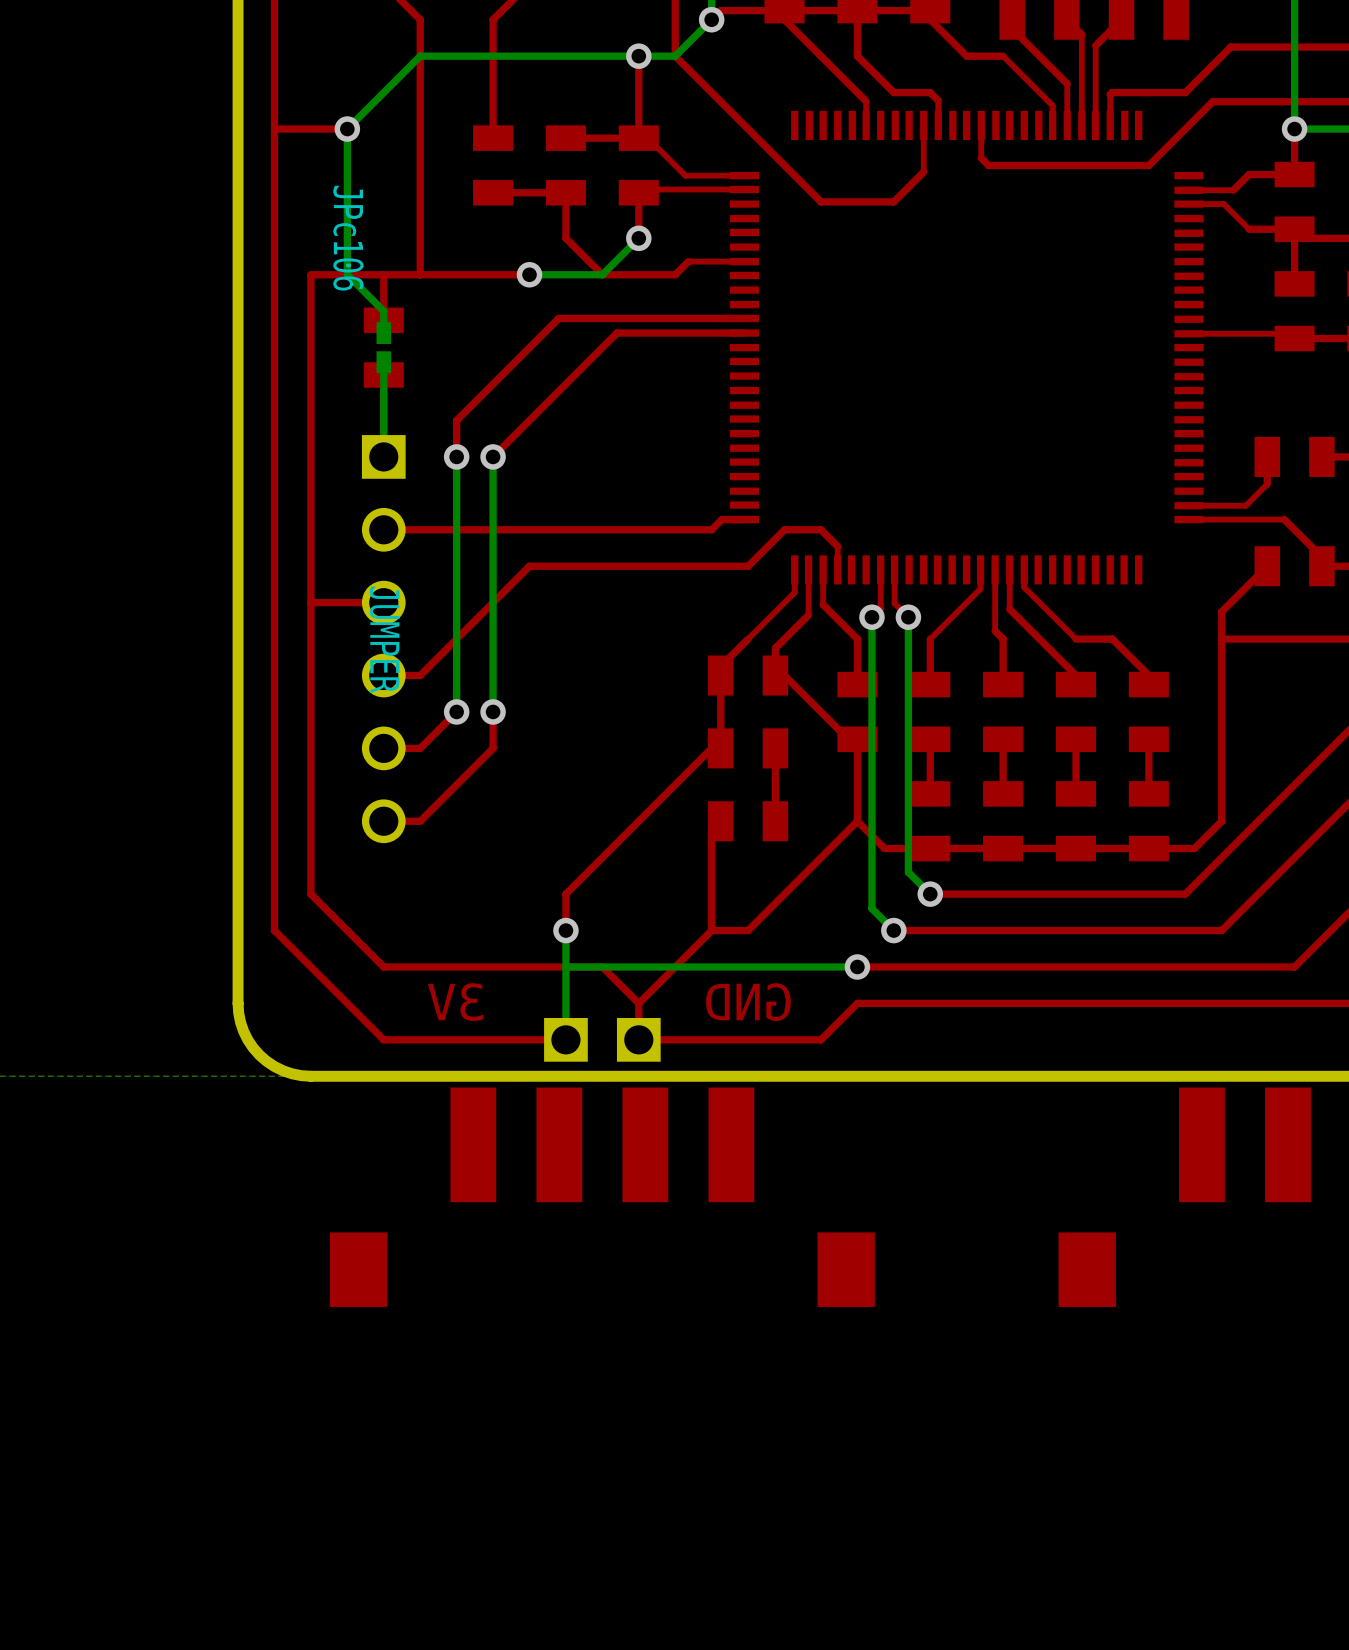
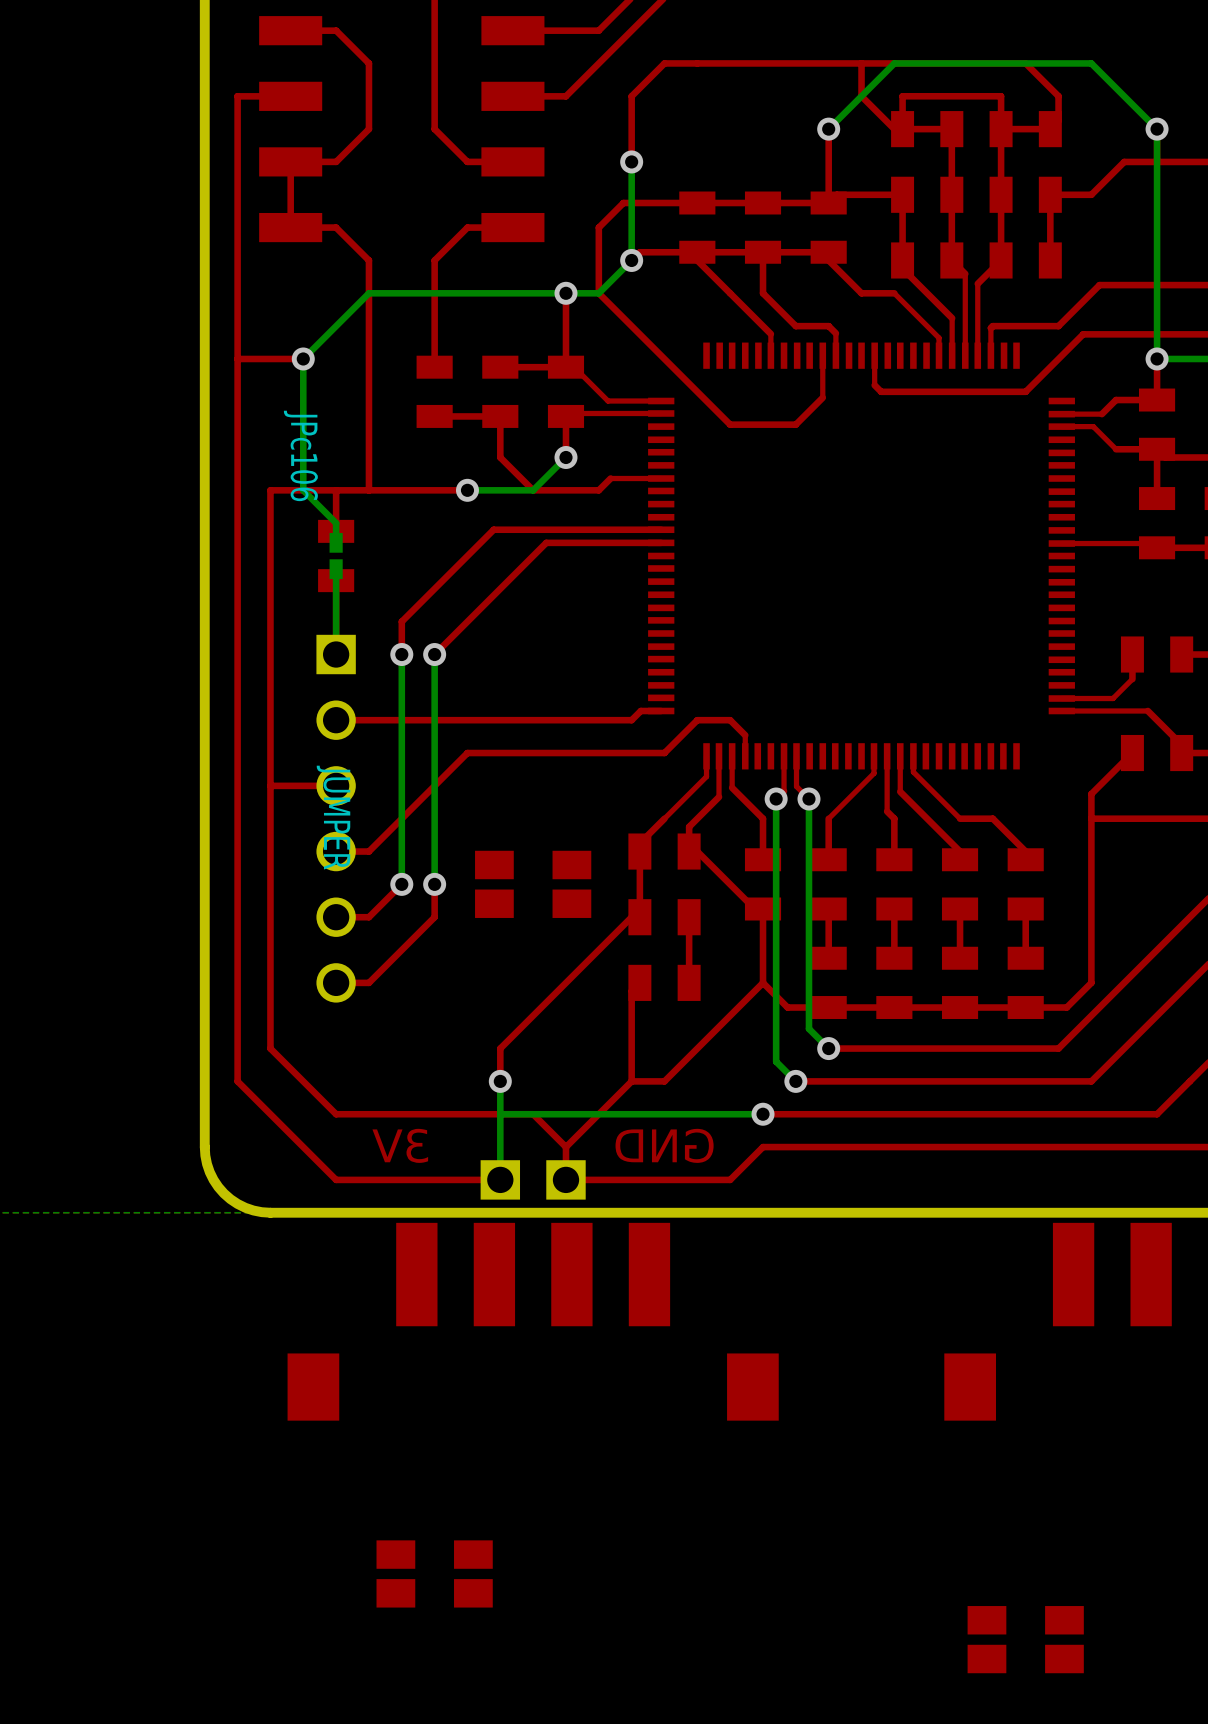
part: none -> (533, 884)
part: none -> (434, 1573)
part: none -> (1025, 1639)

